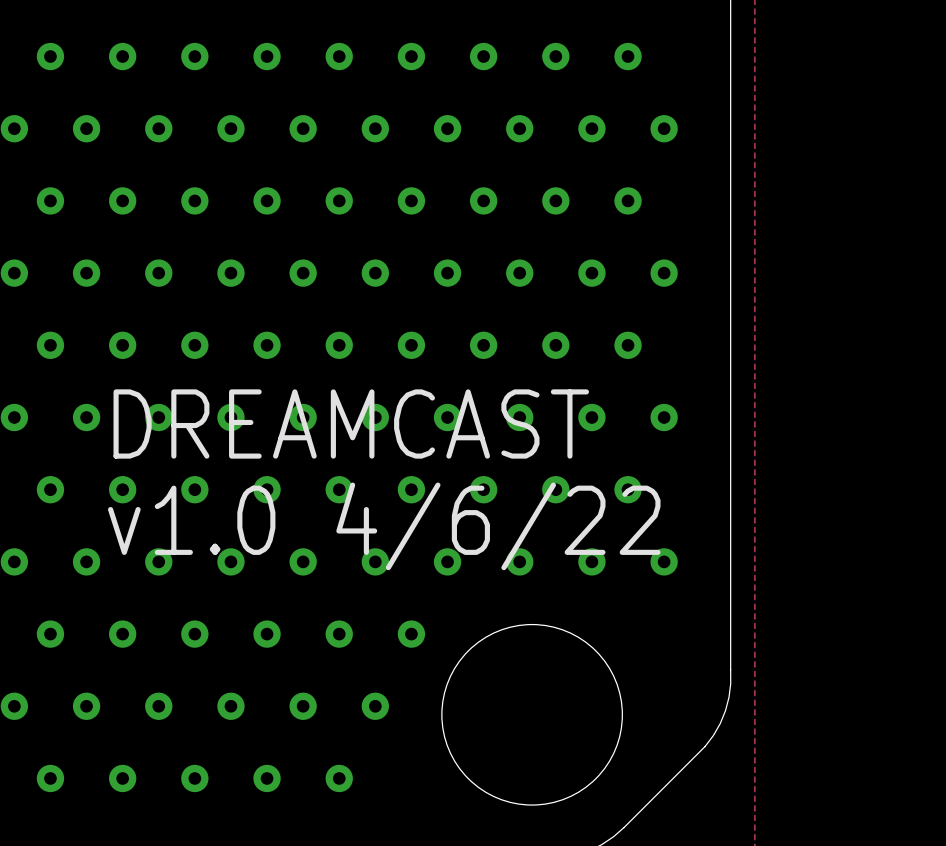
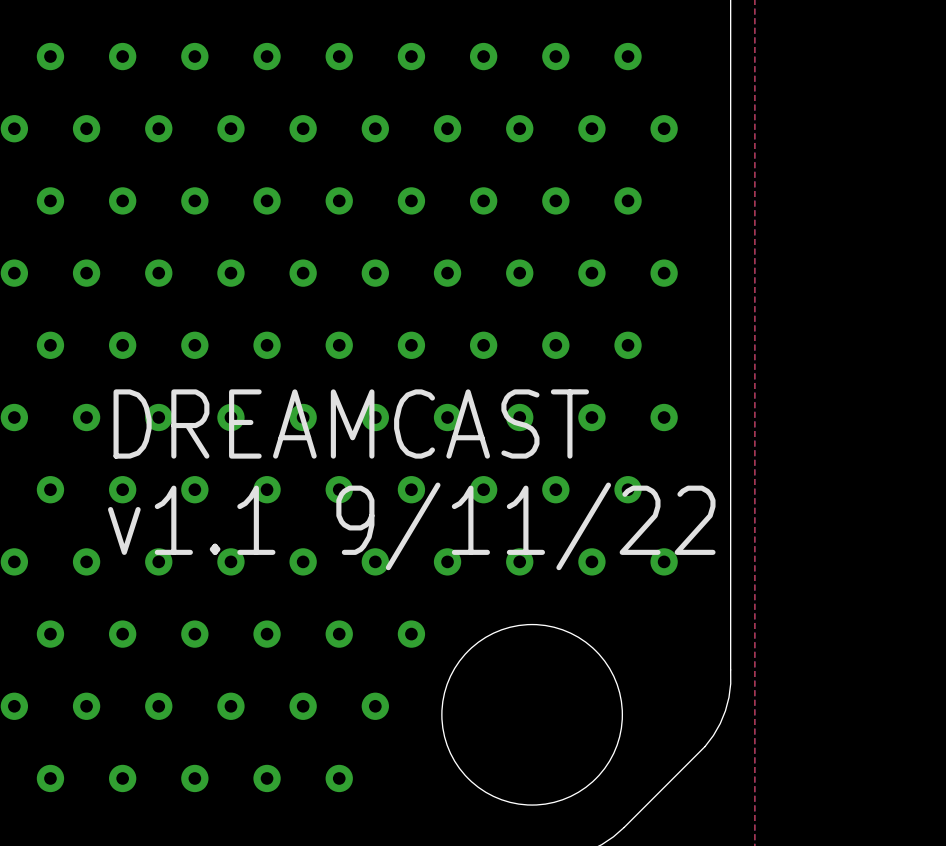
text: v1.0 4/6/22 (384, 526) -> v1.1 9/11/22 (411, 526)

